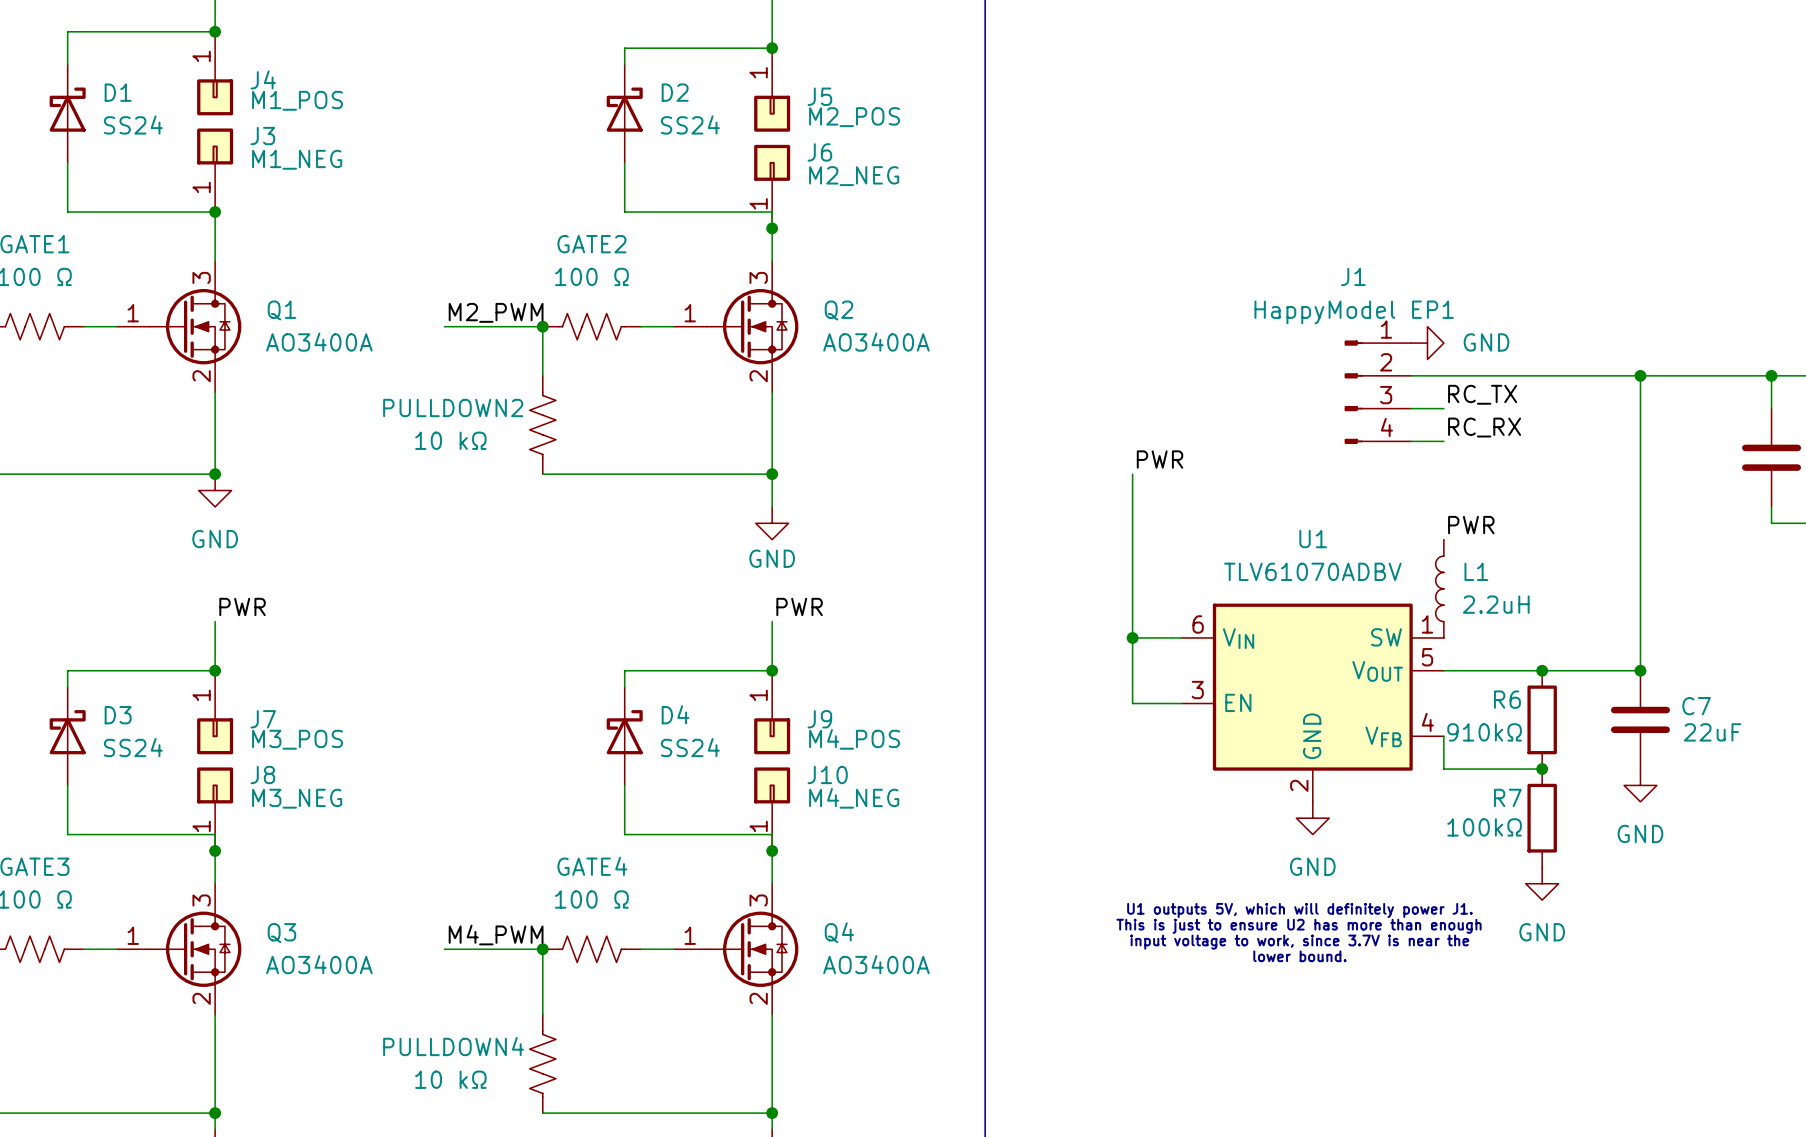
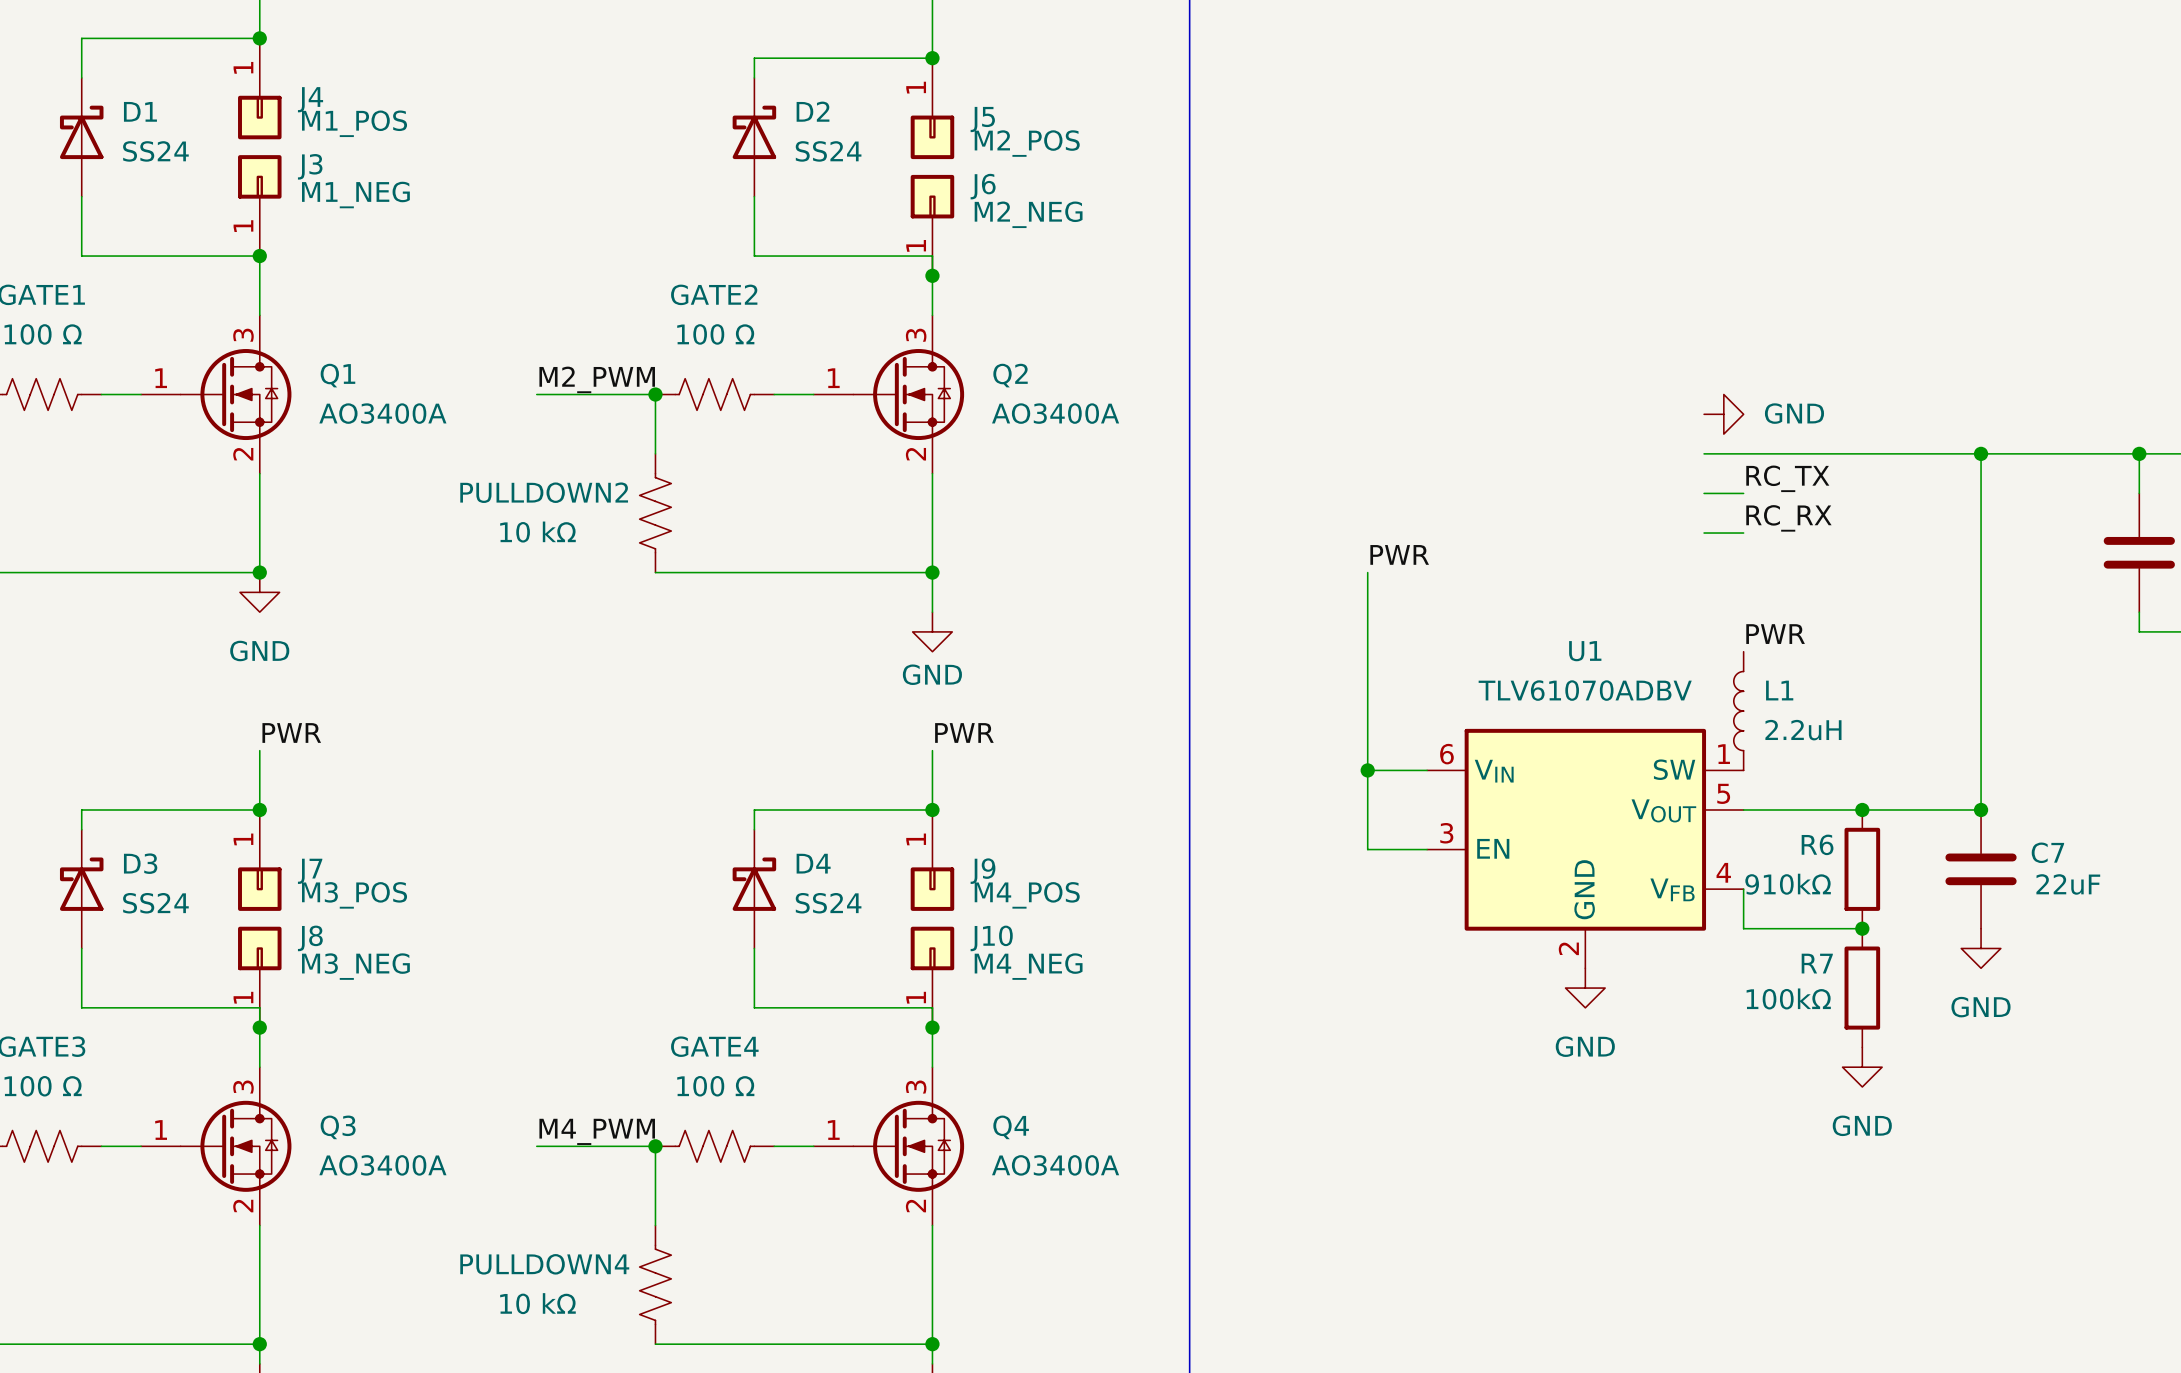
J1: HappyModel EP1 (1377, 392) -> none
text: U1 outputs 5V, which will definitely power J1. (1299, 910) -> none
text: This is just to ensure U2 has more than enough (1299, 926) -> none
text: input voltage to work, since 3.7V is near the (1299, 942) -> none
text: lower bound. (1299, 956) -> none

